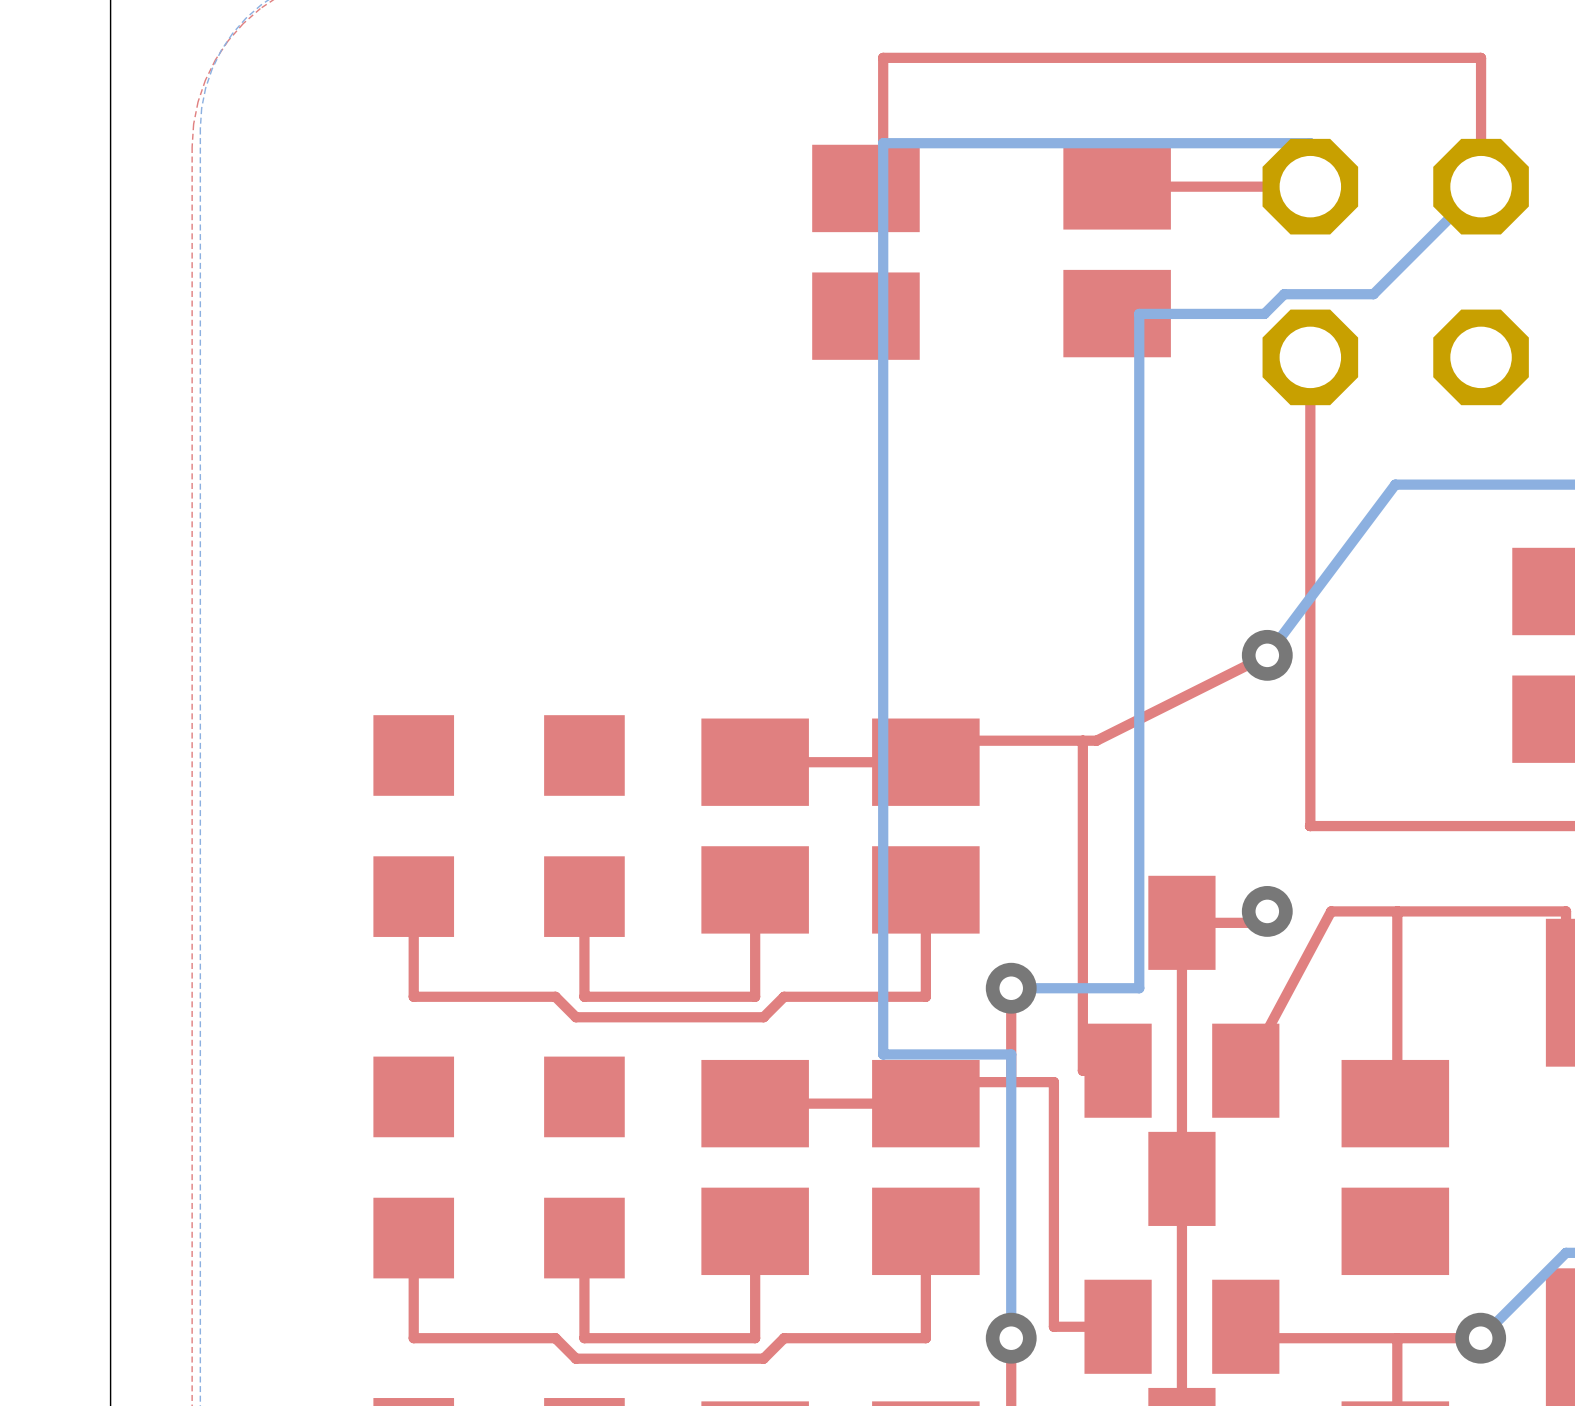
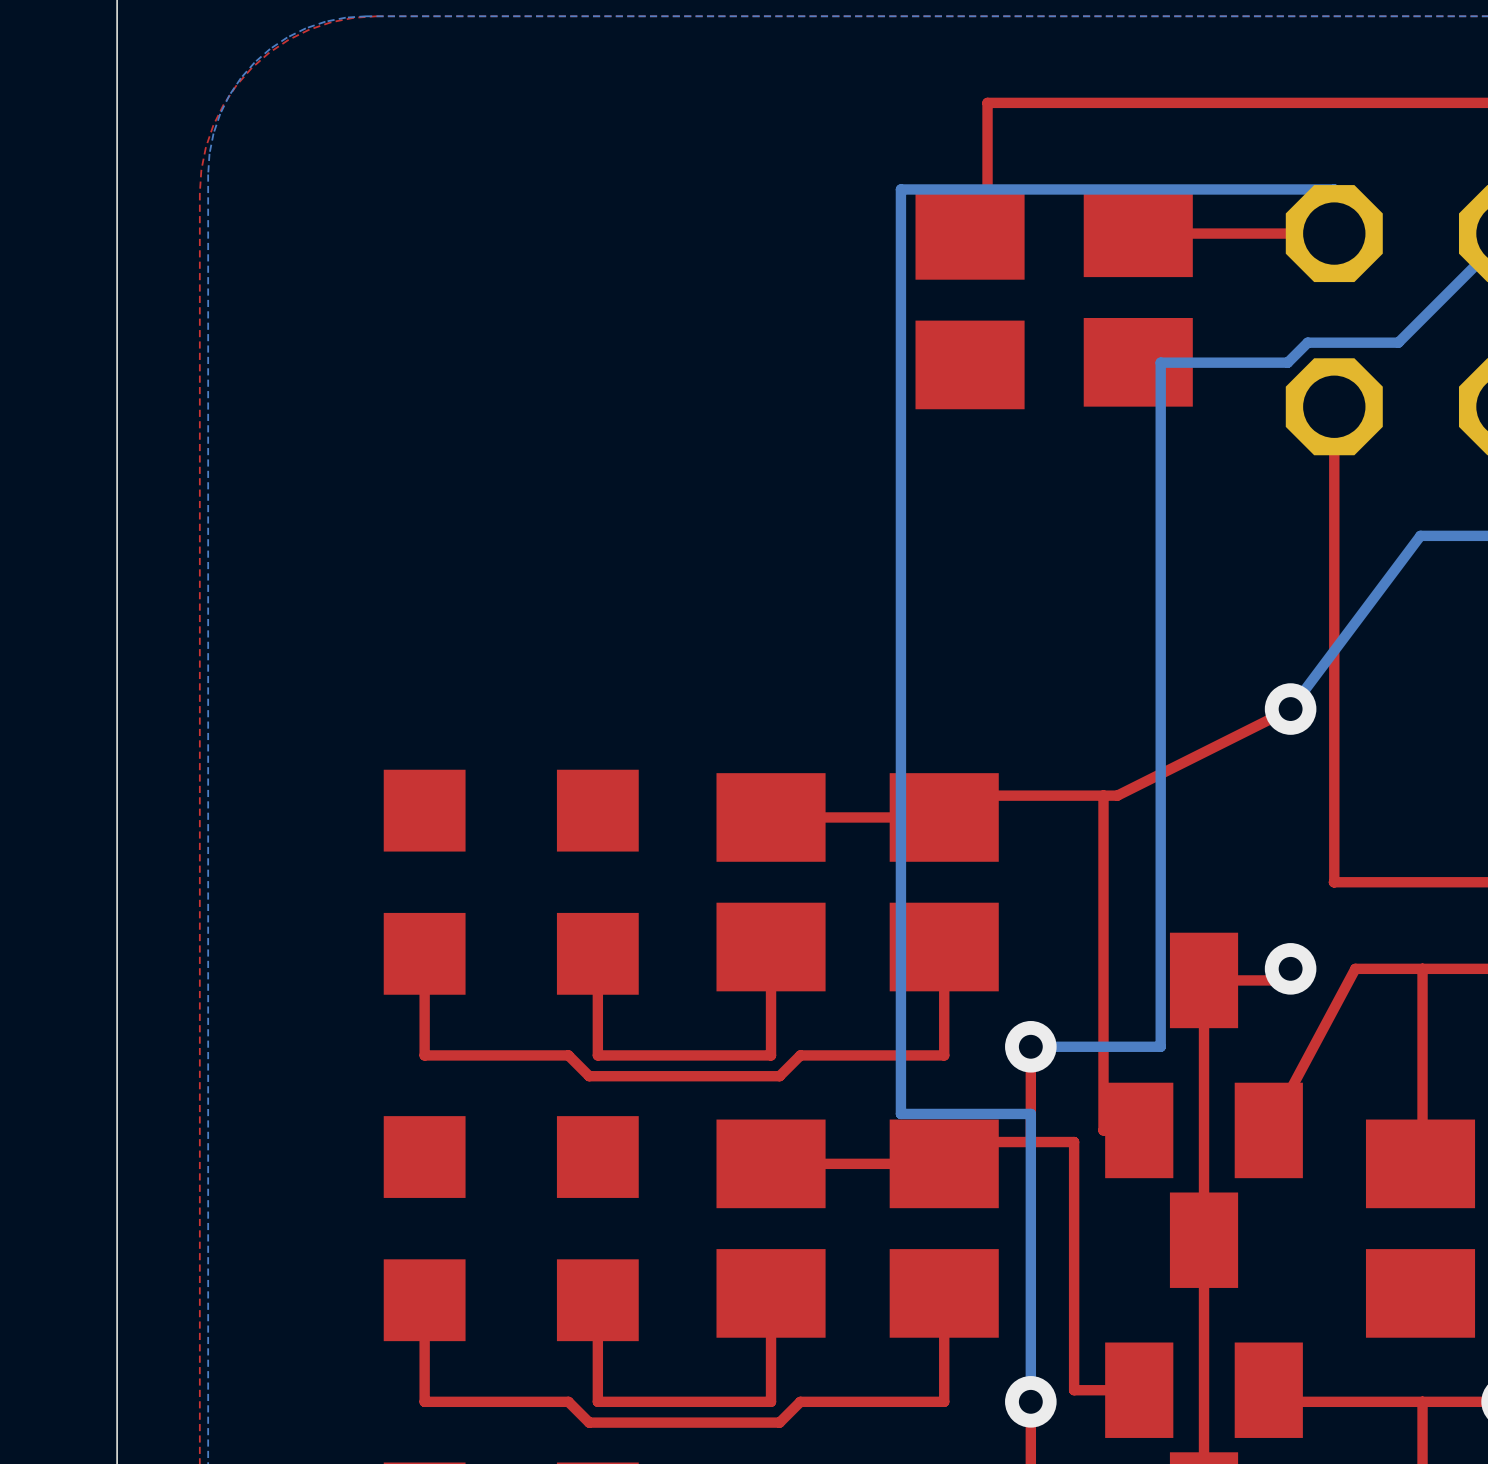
top track: (968, 57) (883, 57) (883, 171) (865, 188) -> (987, 102) (987, 217) (970, 235)
part position: (865, 252) -> (970, 300)

